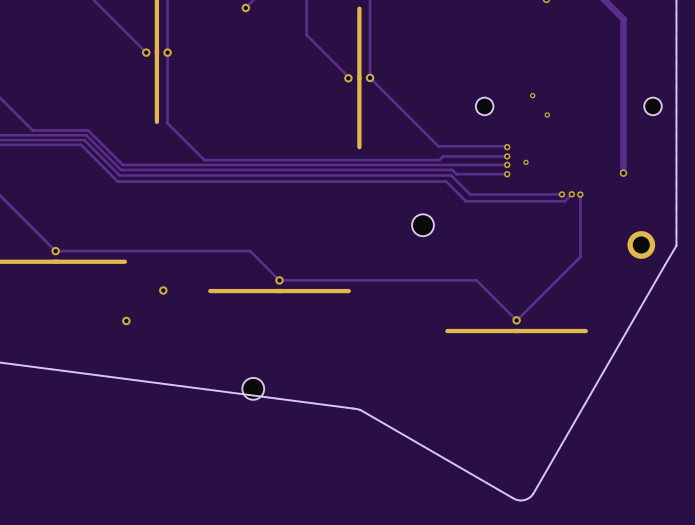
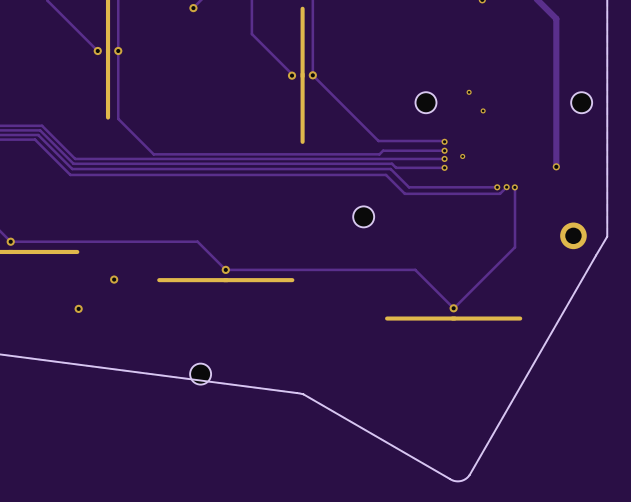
part footprint: [475, 97, 494, 116] -> [415, 92, 437, 114]
part footprint: [644, 97, 662, 116] -> [571, 92, 593, 114]

